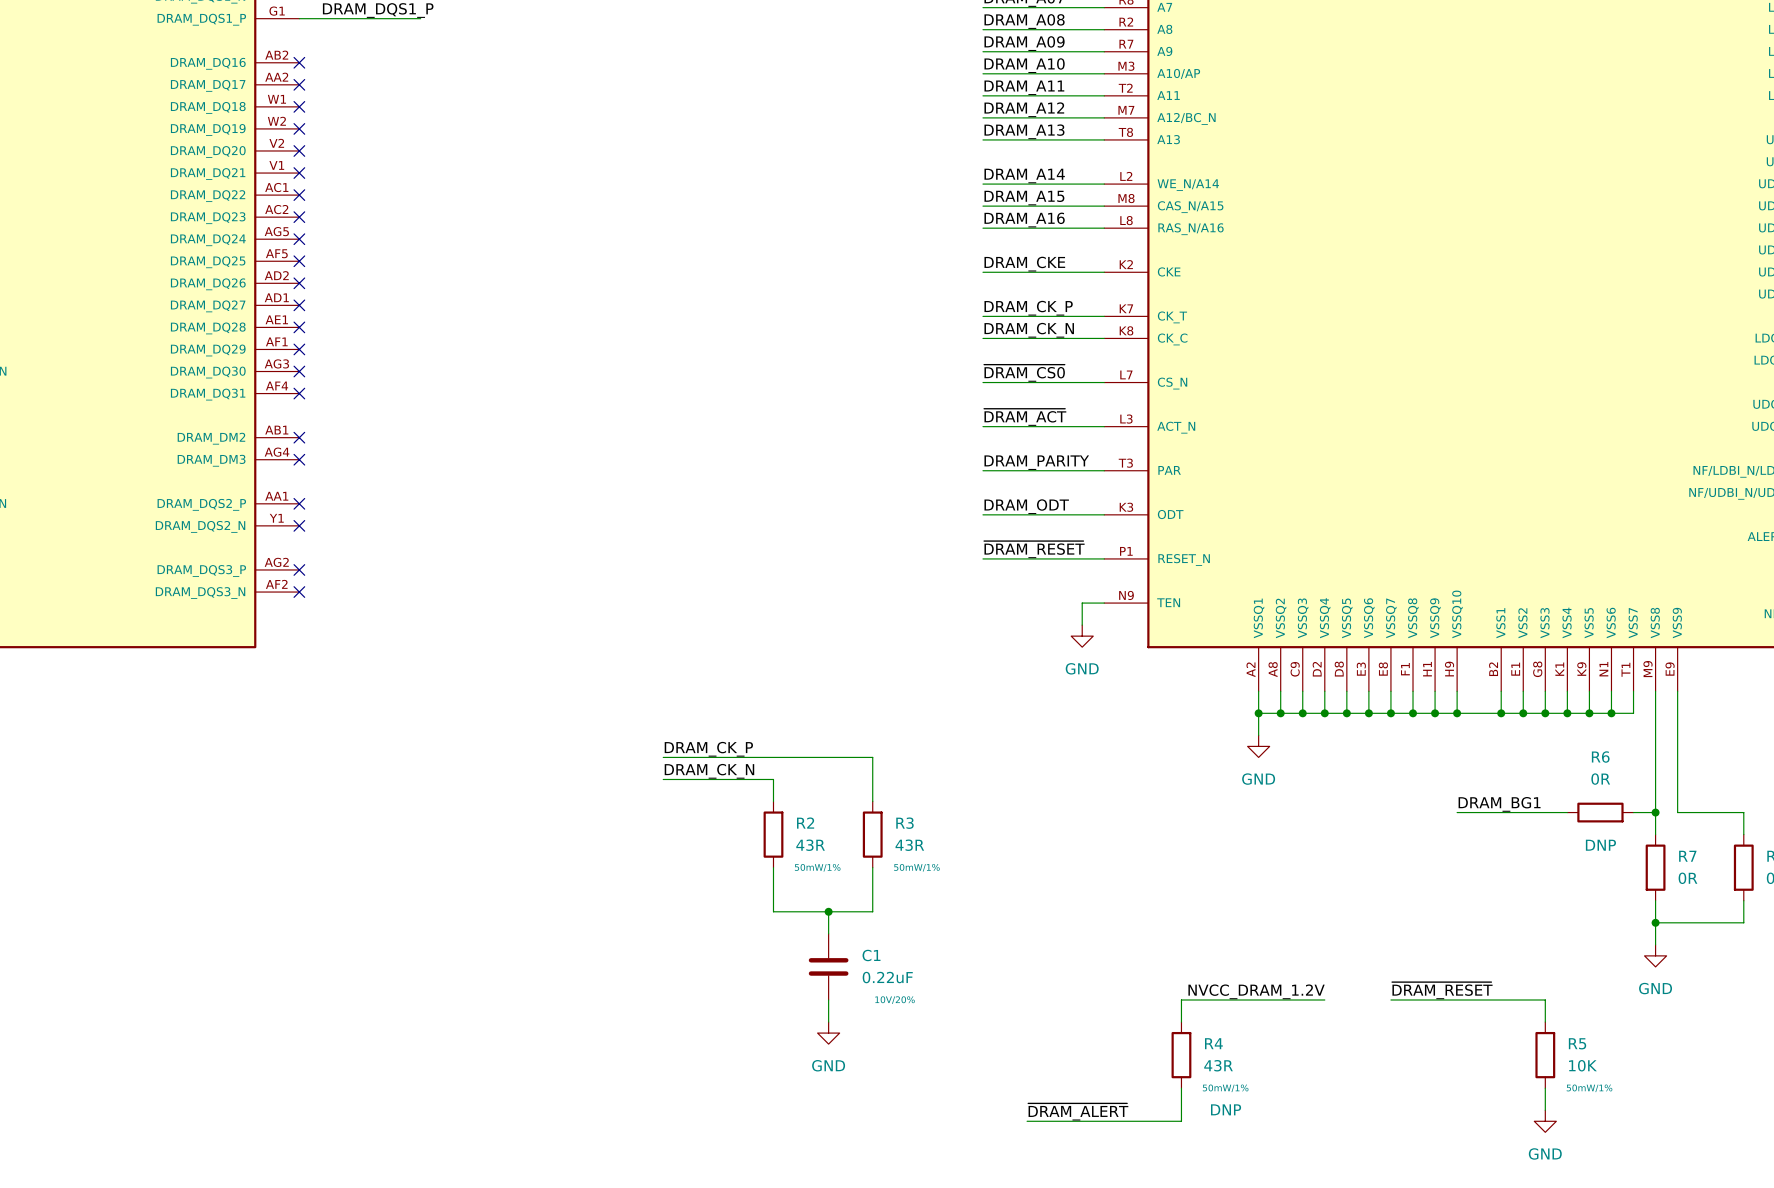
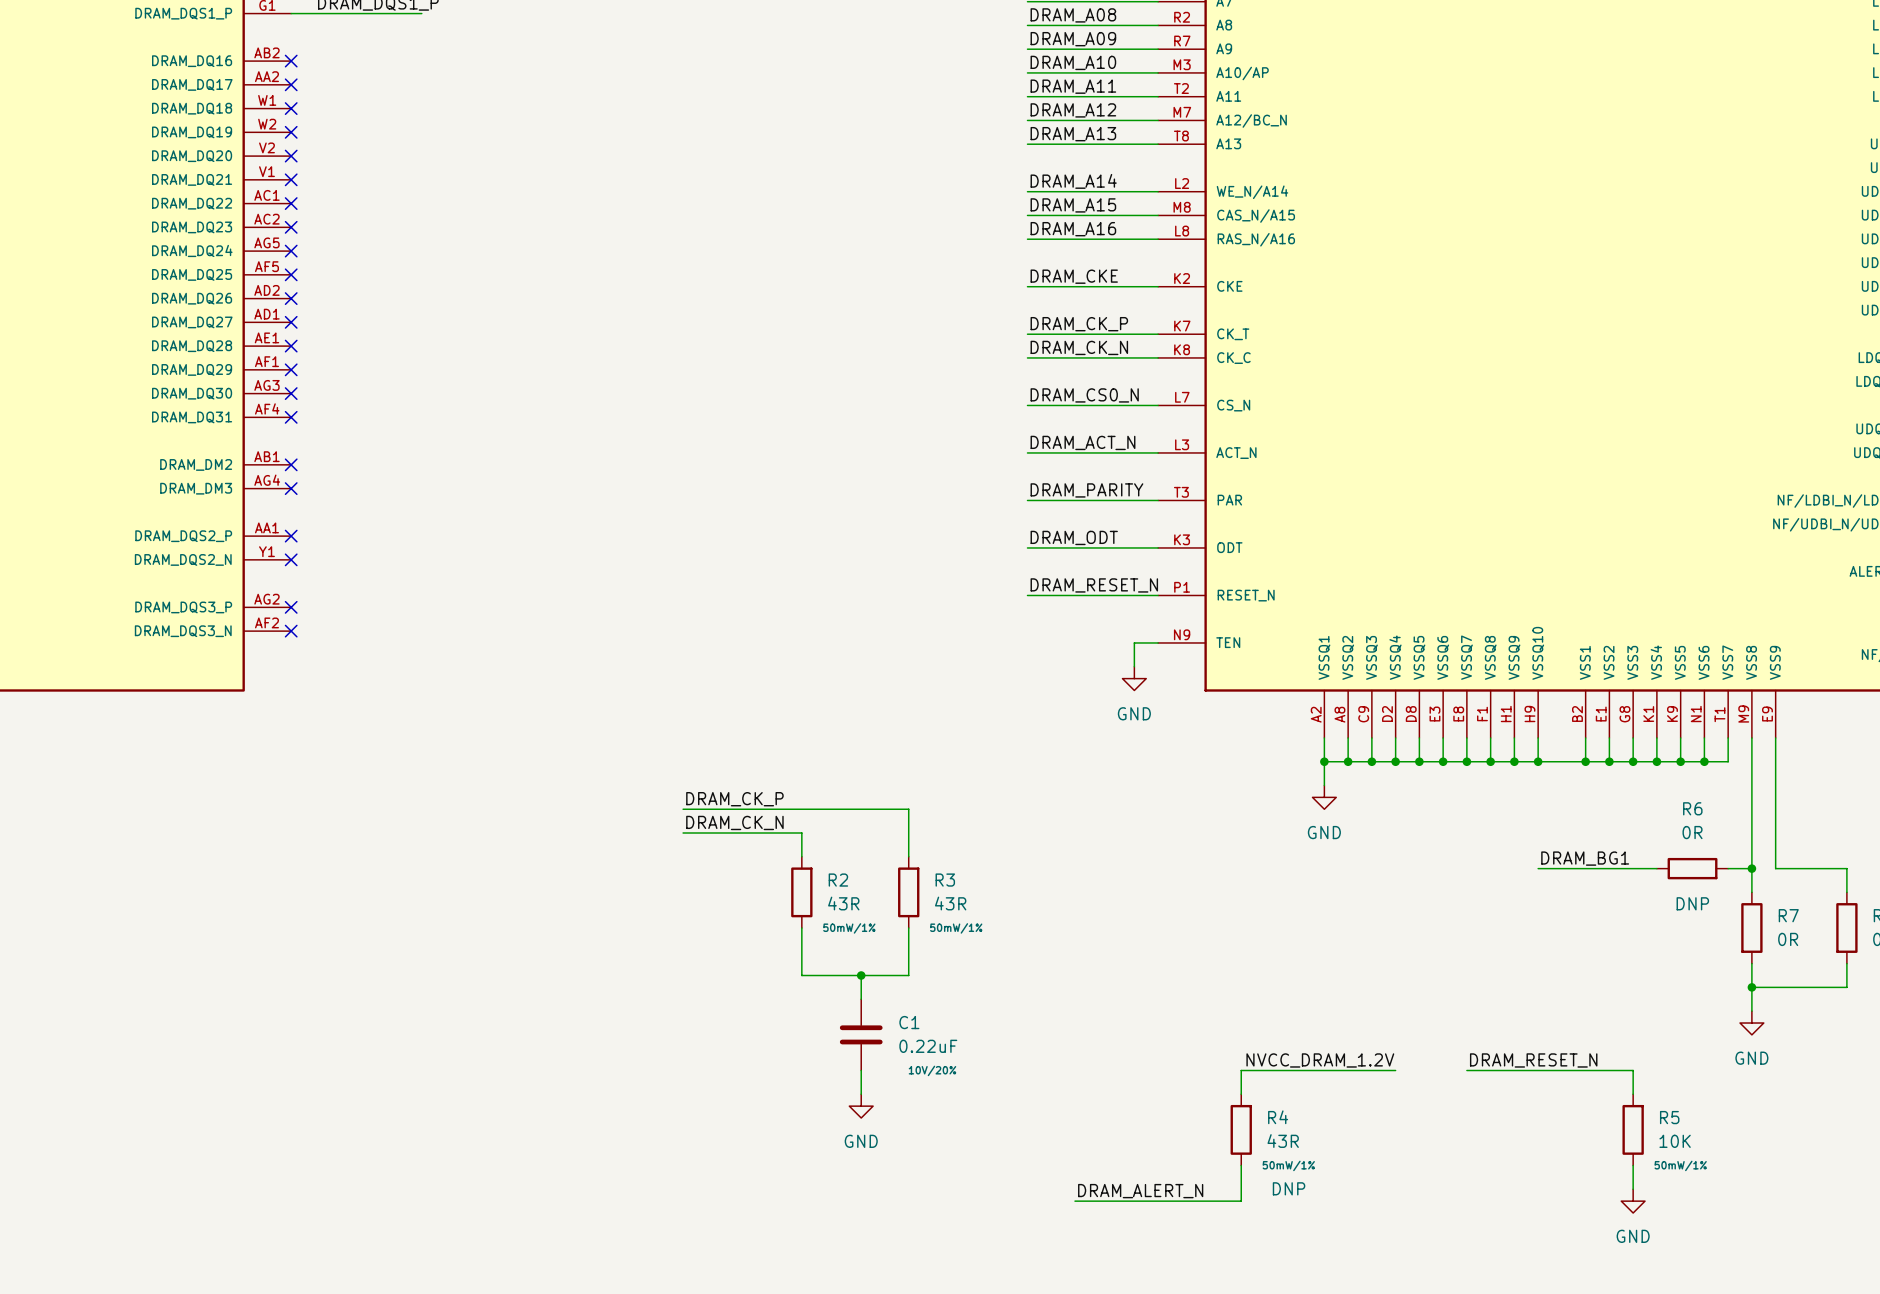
label: ~{DRAM_CS0} (1024, 373) -> DRAM_CS0_N (1084, 395)
label: ~{DRAM_ACT} (1025, 417) -> DRAM_ACT_N (1082, 442)
label: ~{DRAM_RESET} (1034, 549) -> DRAM_RESET_N (1094, 585)
label: ~{DRAM_RESET} (1442, 990) -> DRAM_RESET_N (1533, 1060)
label: ~{DRAM_ALERT} (1078, 1111) -> DRAM_ALERT_N (1140, 1191)

